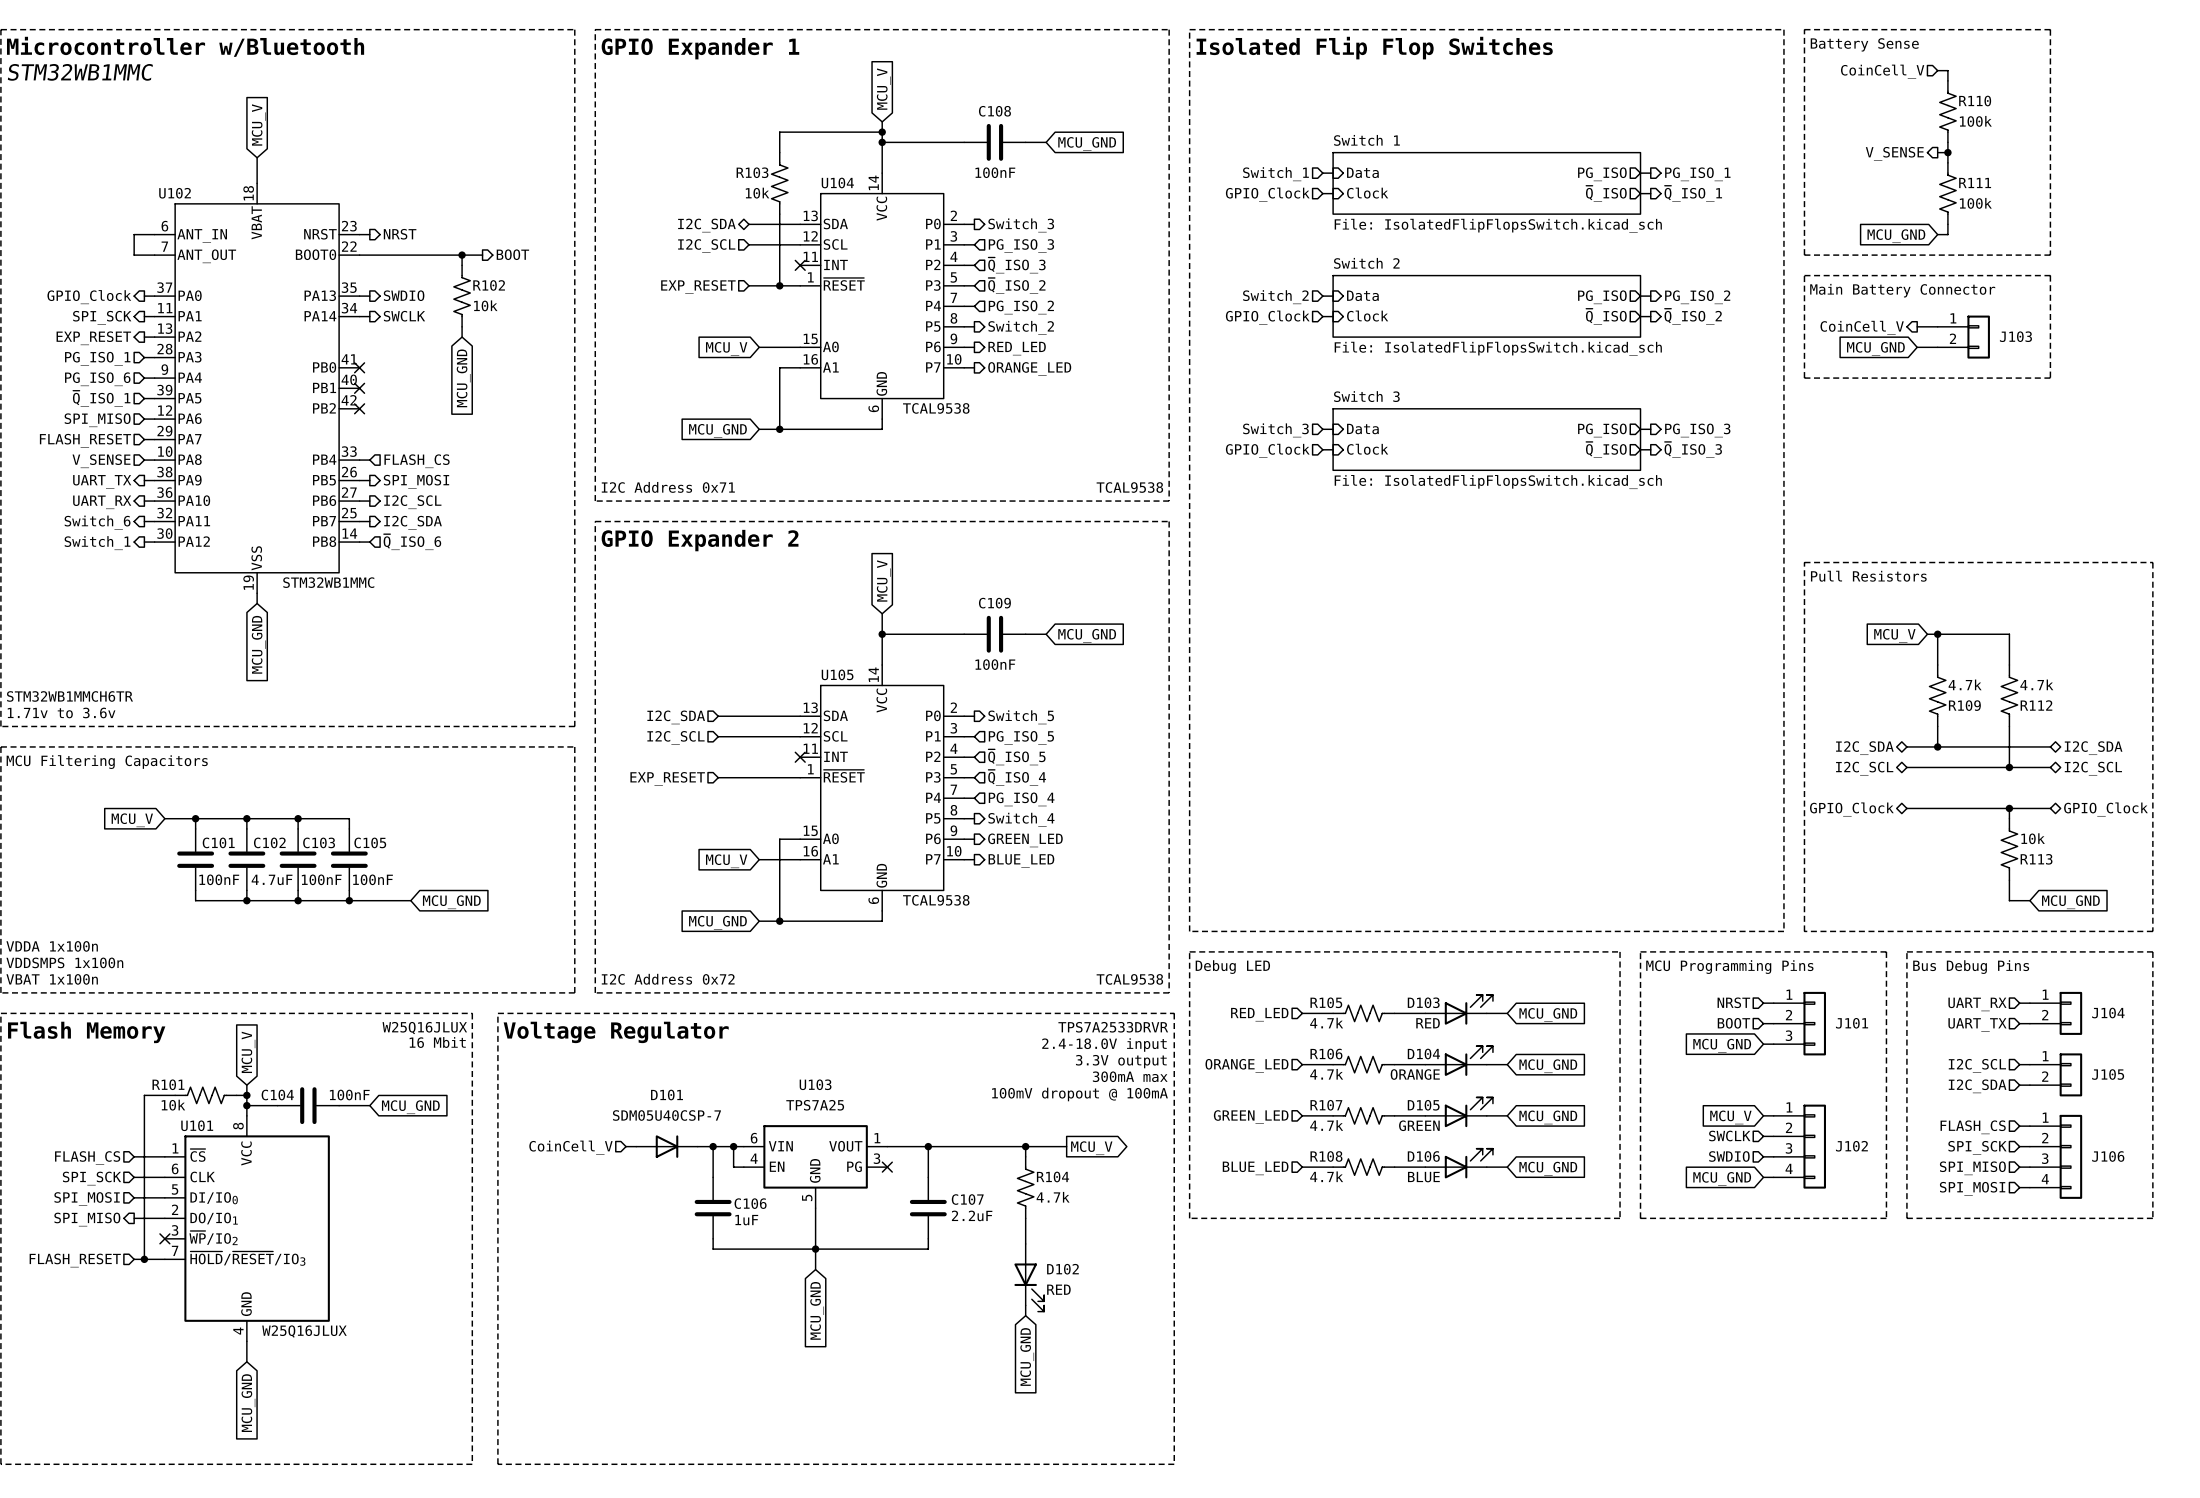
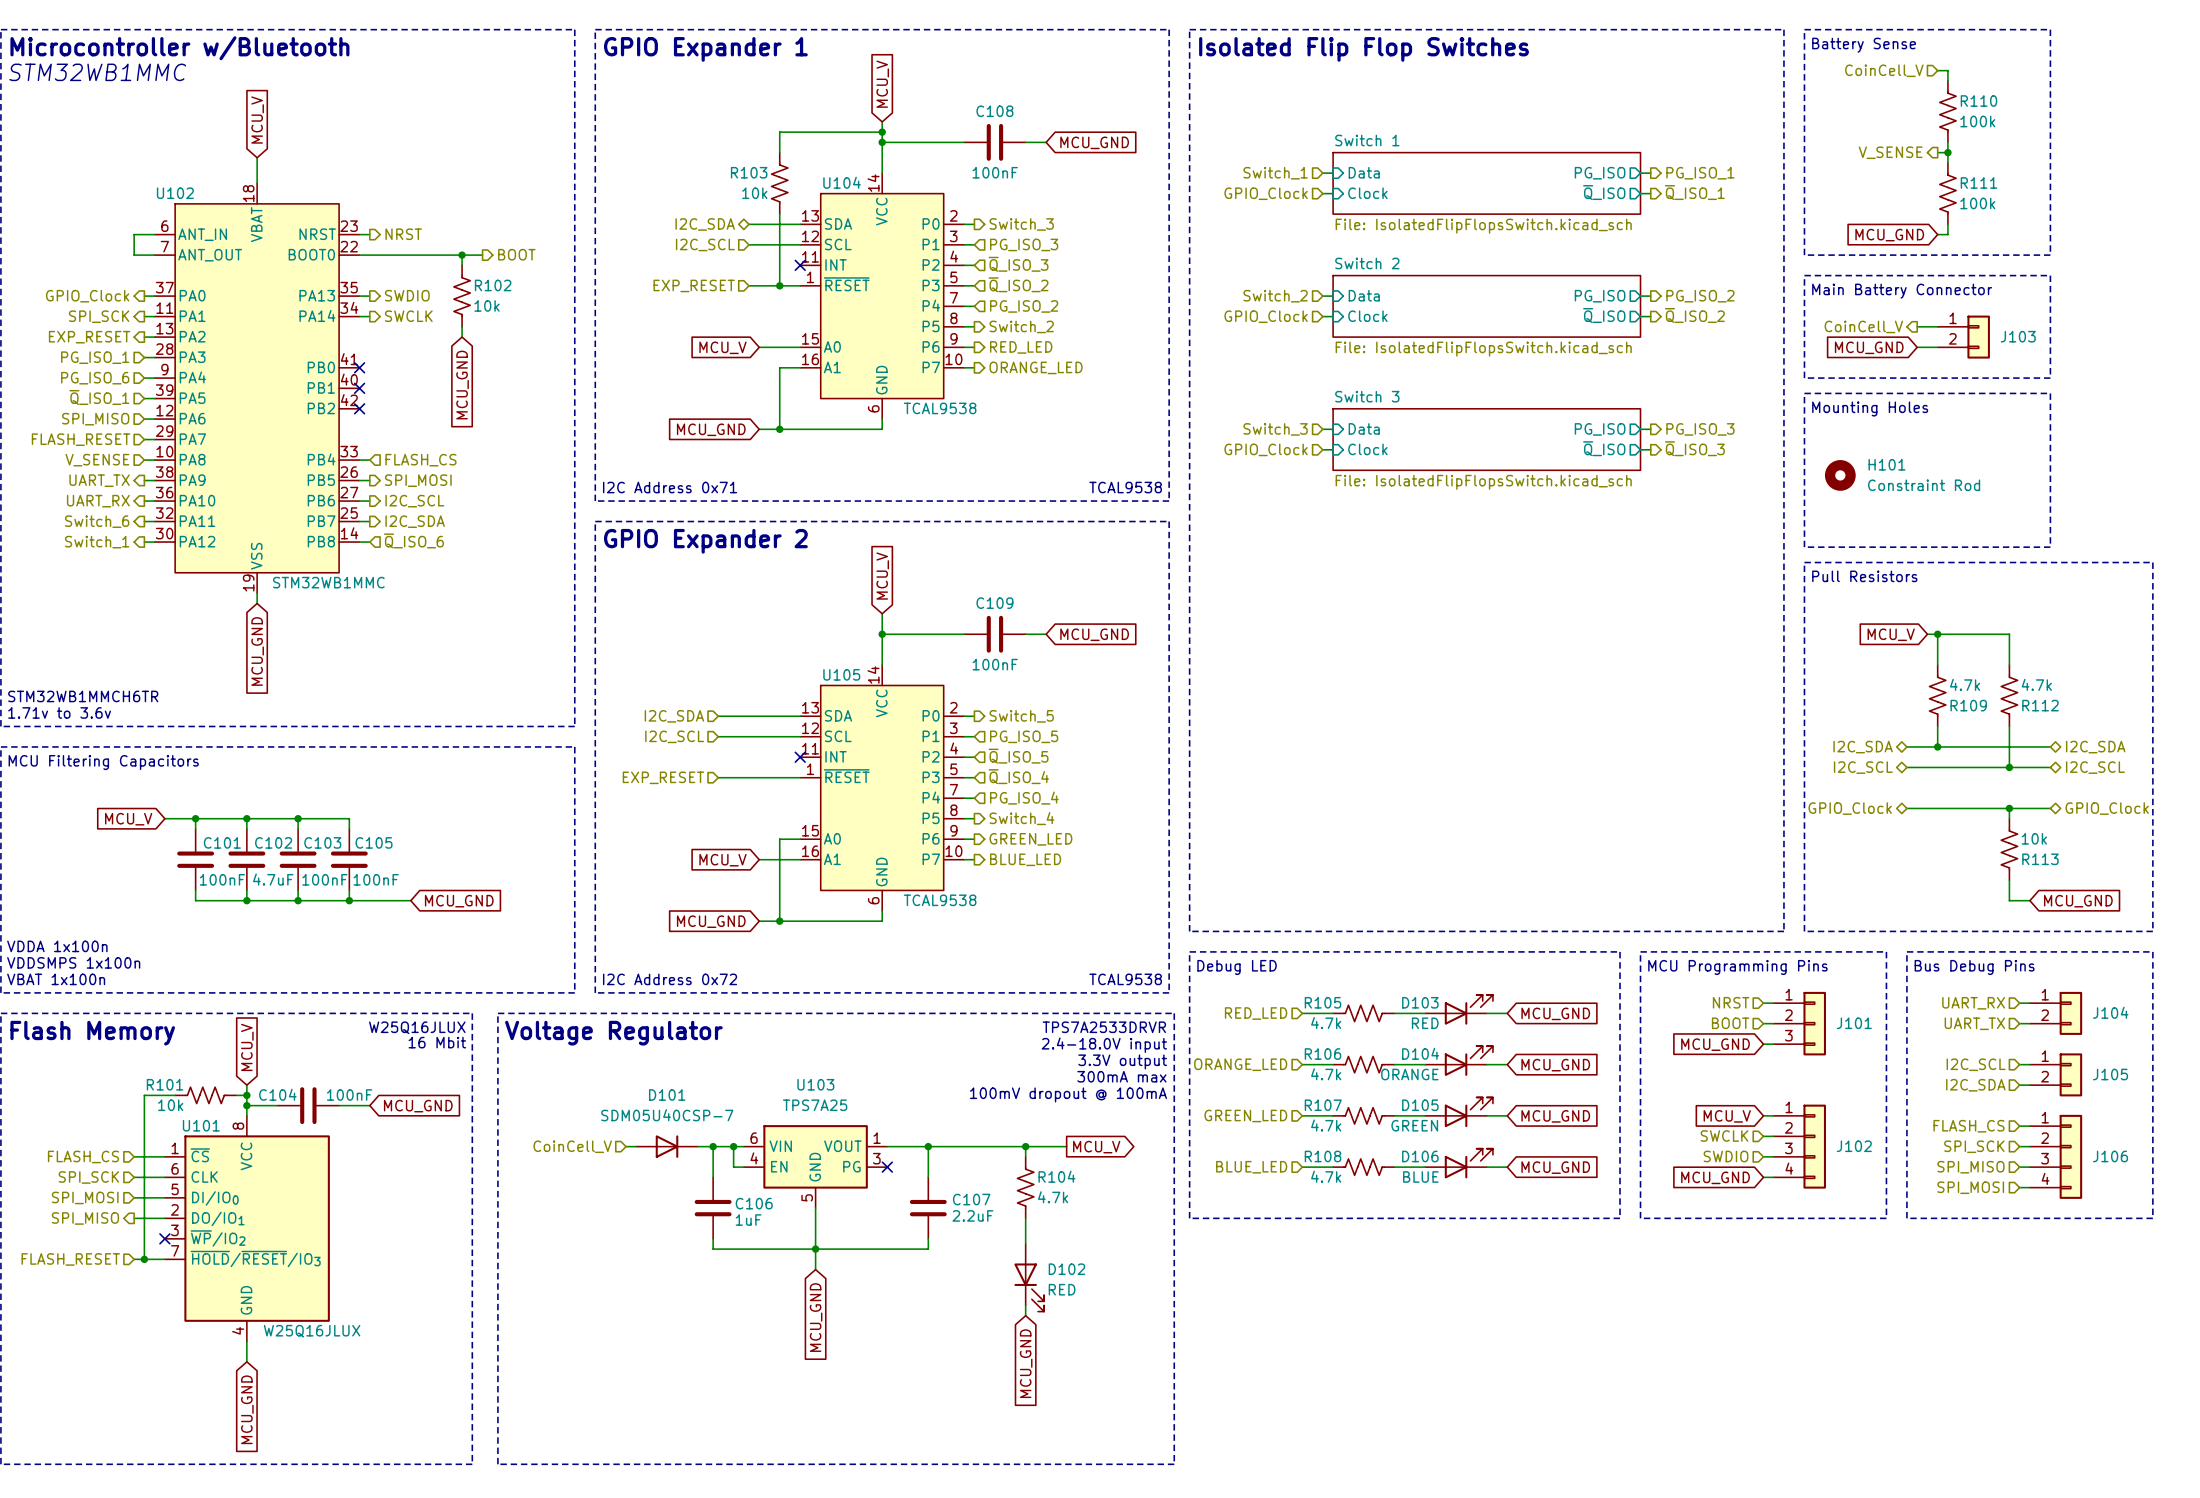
line: none -> (1804, 393) (2050, 393) (2050, 547) (1804, 547) (1804, 393)
text: none -> Mounting Holes (1870, 408)
H101: none -> Constraint Rod (1840, 475)

